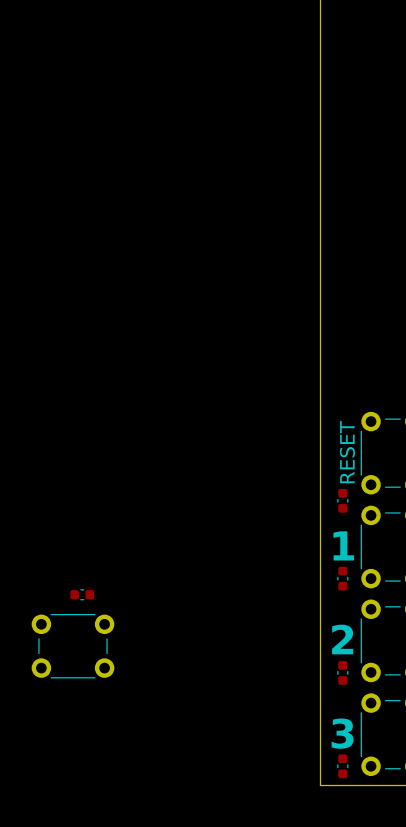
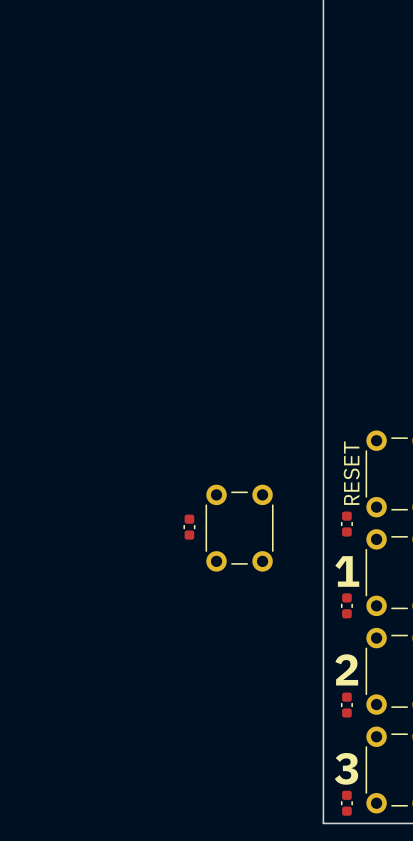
part rotation: 0° (82, 594) -> 90° clockwise (189, 527)
part position: (82, 594) -> (189, 527)
part rotation: 0° (73, 646) -> 90° clockwise (239, 528)
part position: (73, 646) -> (239, 528)

